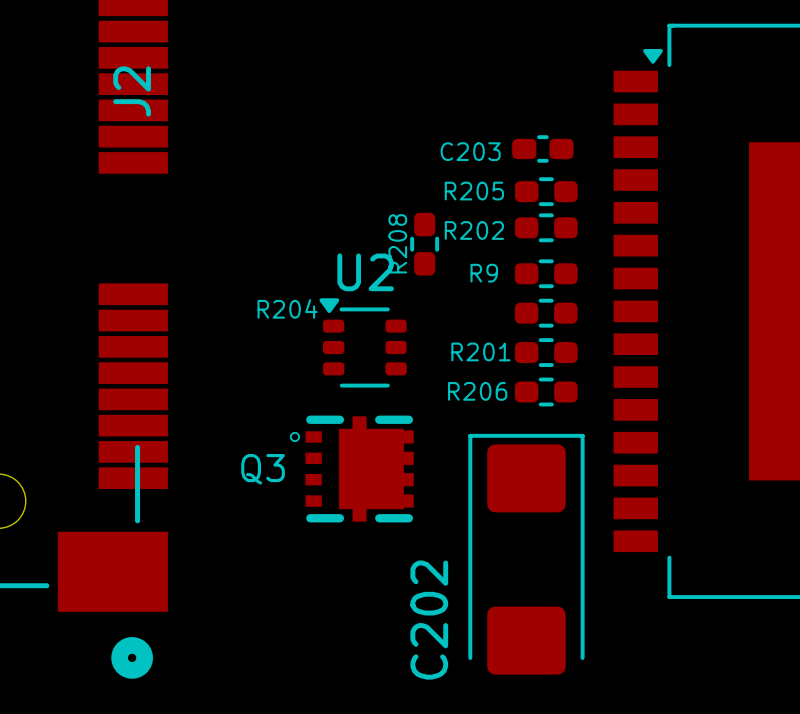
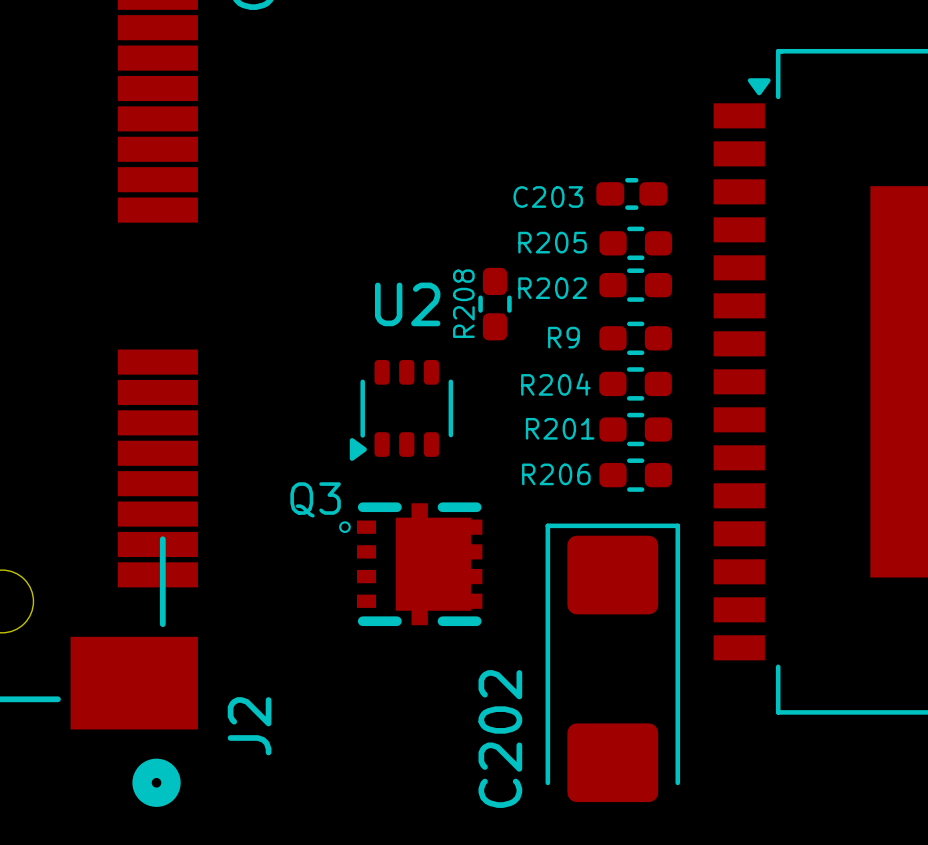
J2 name position: J2 (132, 91) -> J2 (249, 726)
R204 name position: R204 (287, 308) -> R204 (555, 384)
U2 rotation: 0° (363, 342) -> 90° counterclockwise (401, 410)
Q3 name position: Q3 (263, 469) -> Q3 (315, 499)

